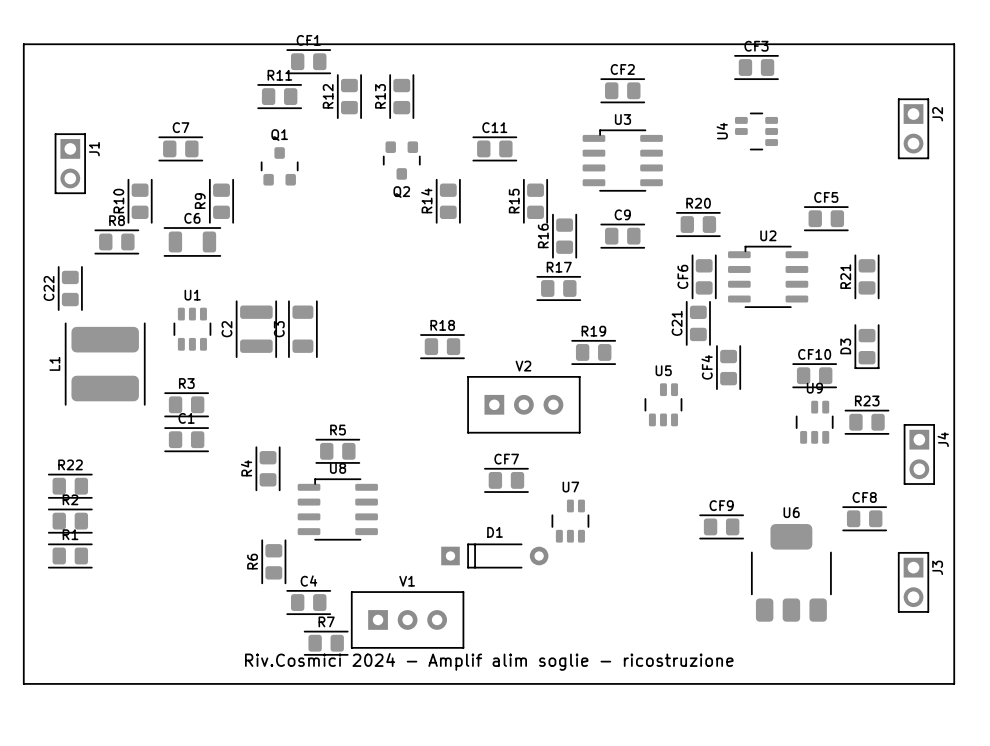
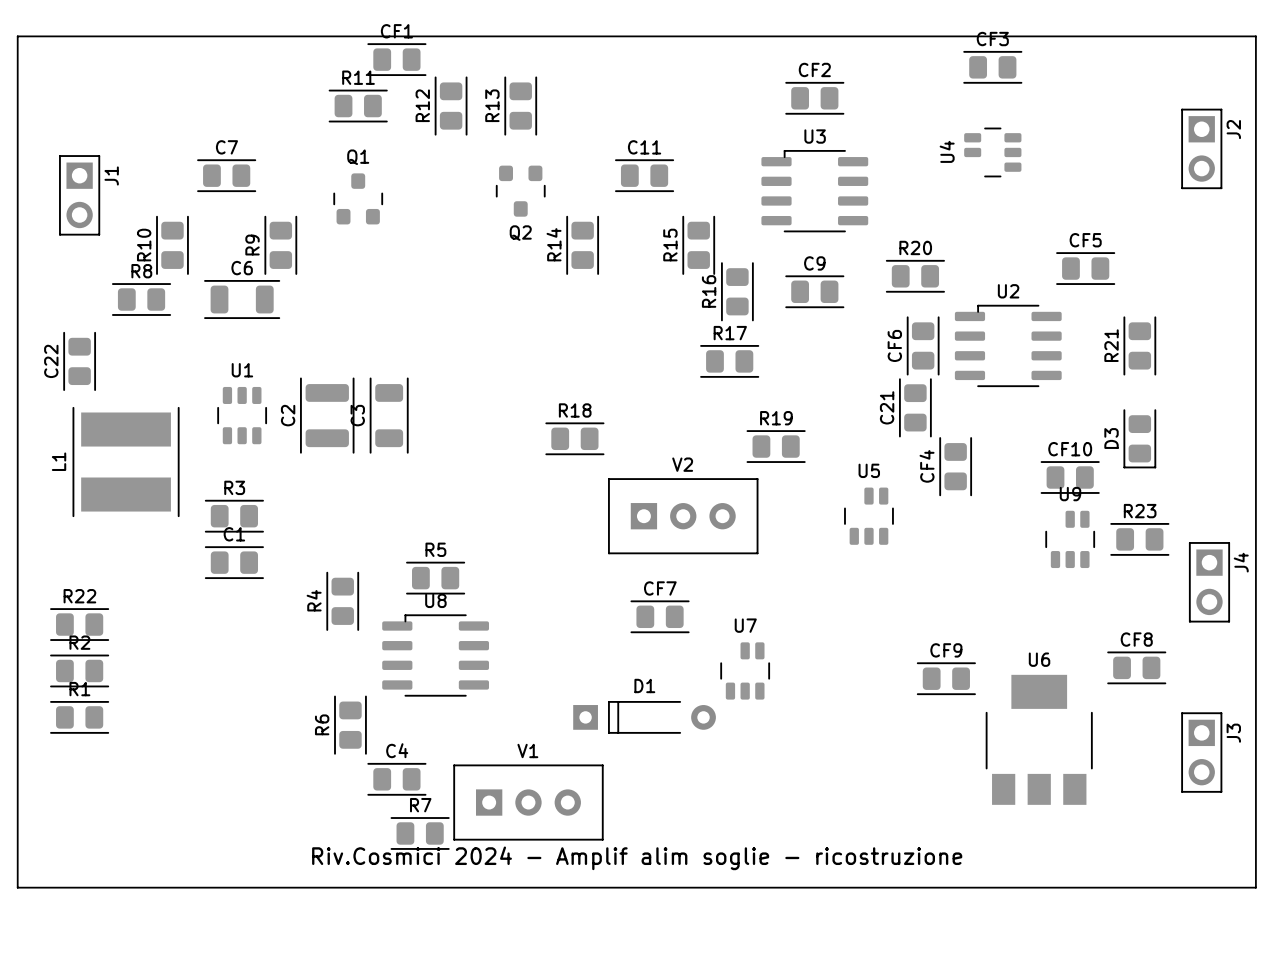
L1 footprint: [64, 322, 146, 406] -> [72, 406, 180, 518]
U6 footprint: [751, 524, 832, 622] -> [985, 674, 1093, 805]

